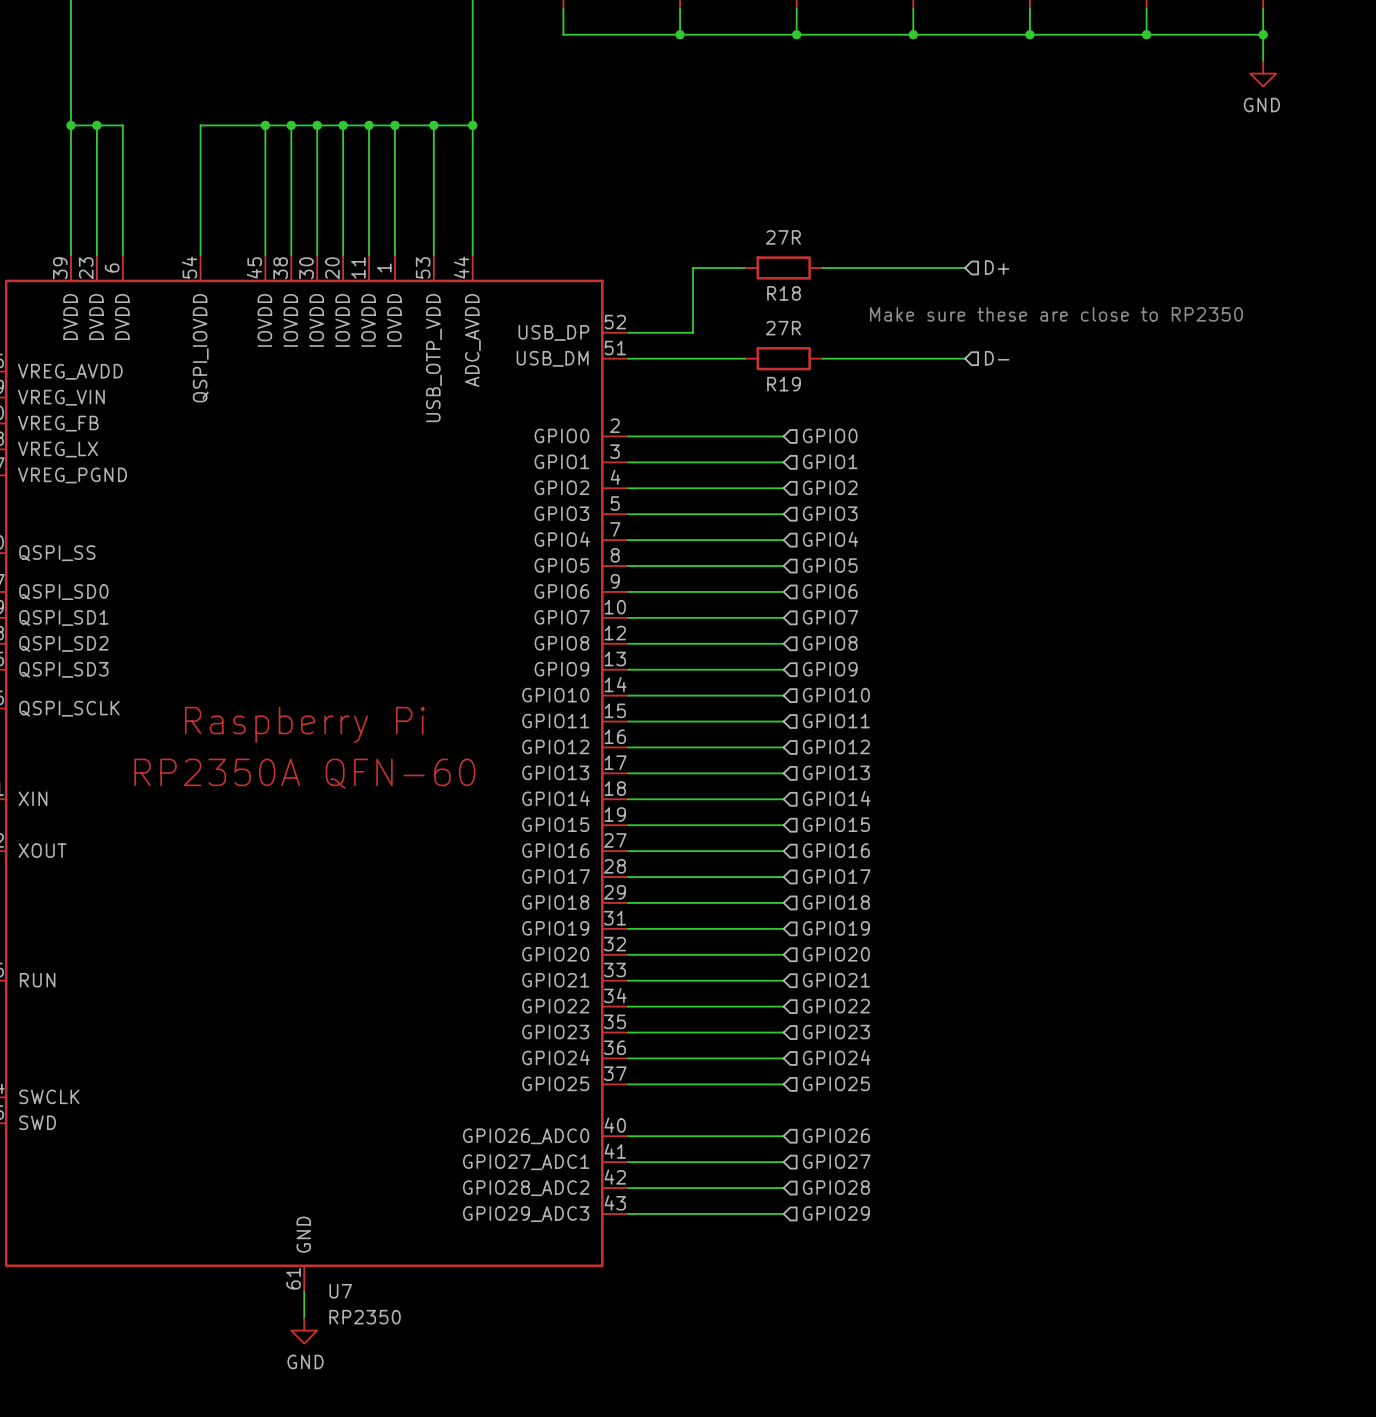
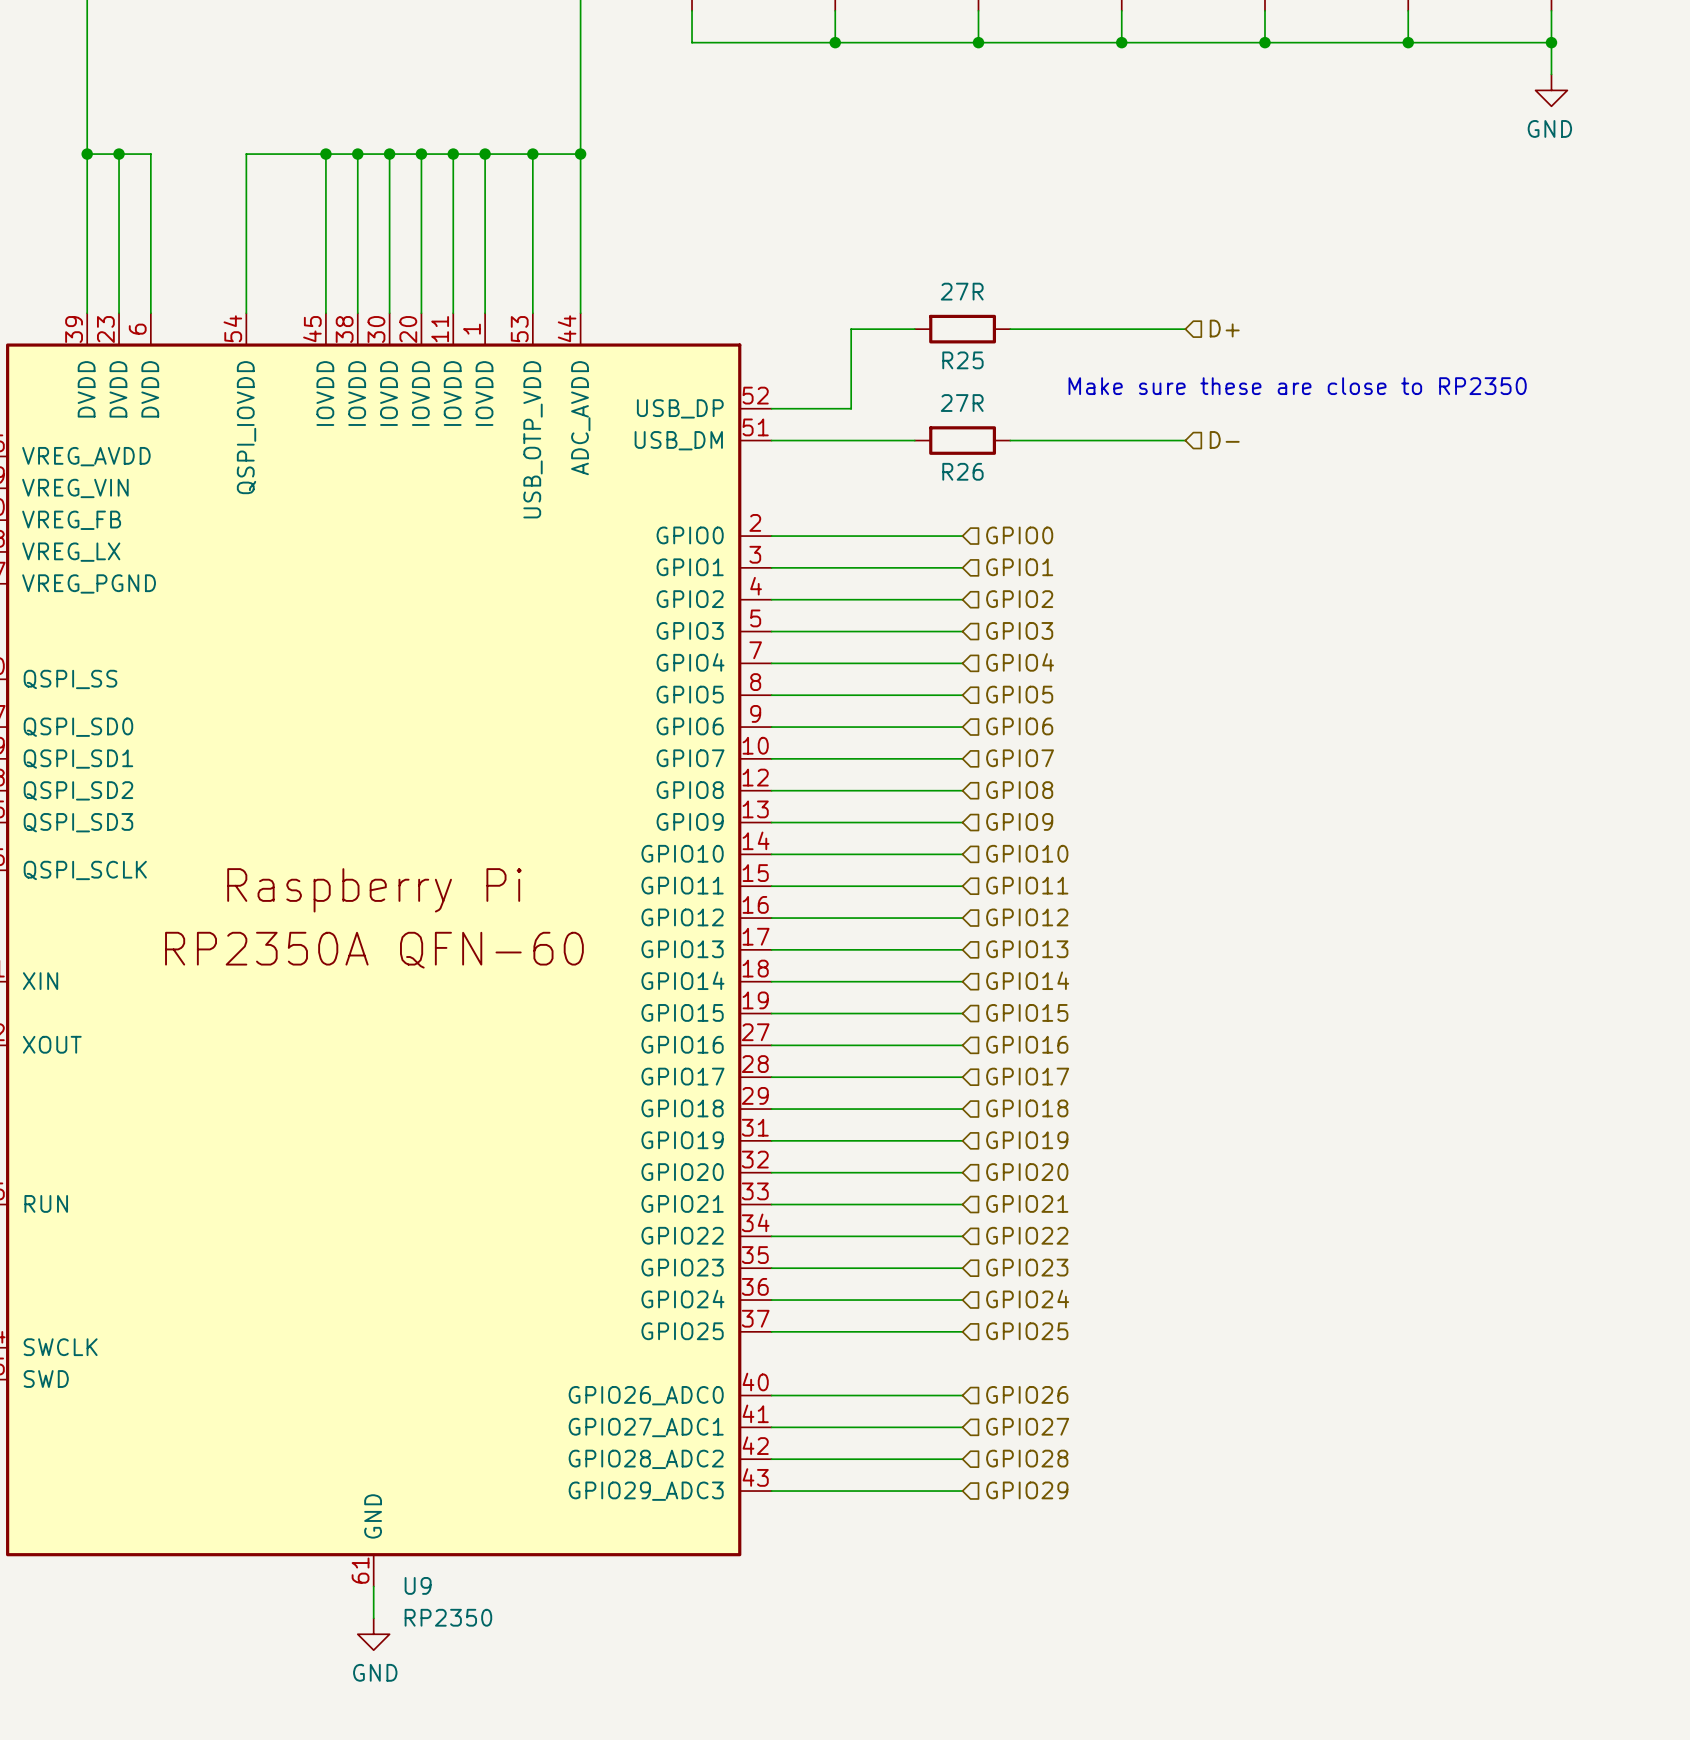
R18 name: R18 (784, 293) -> R25 (962, 360)
R19 name: R19 (784, 384) -> R26 (962, 471)
U7 name: U7 (340, 1291) -> U9 (418, 1585)

